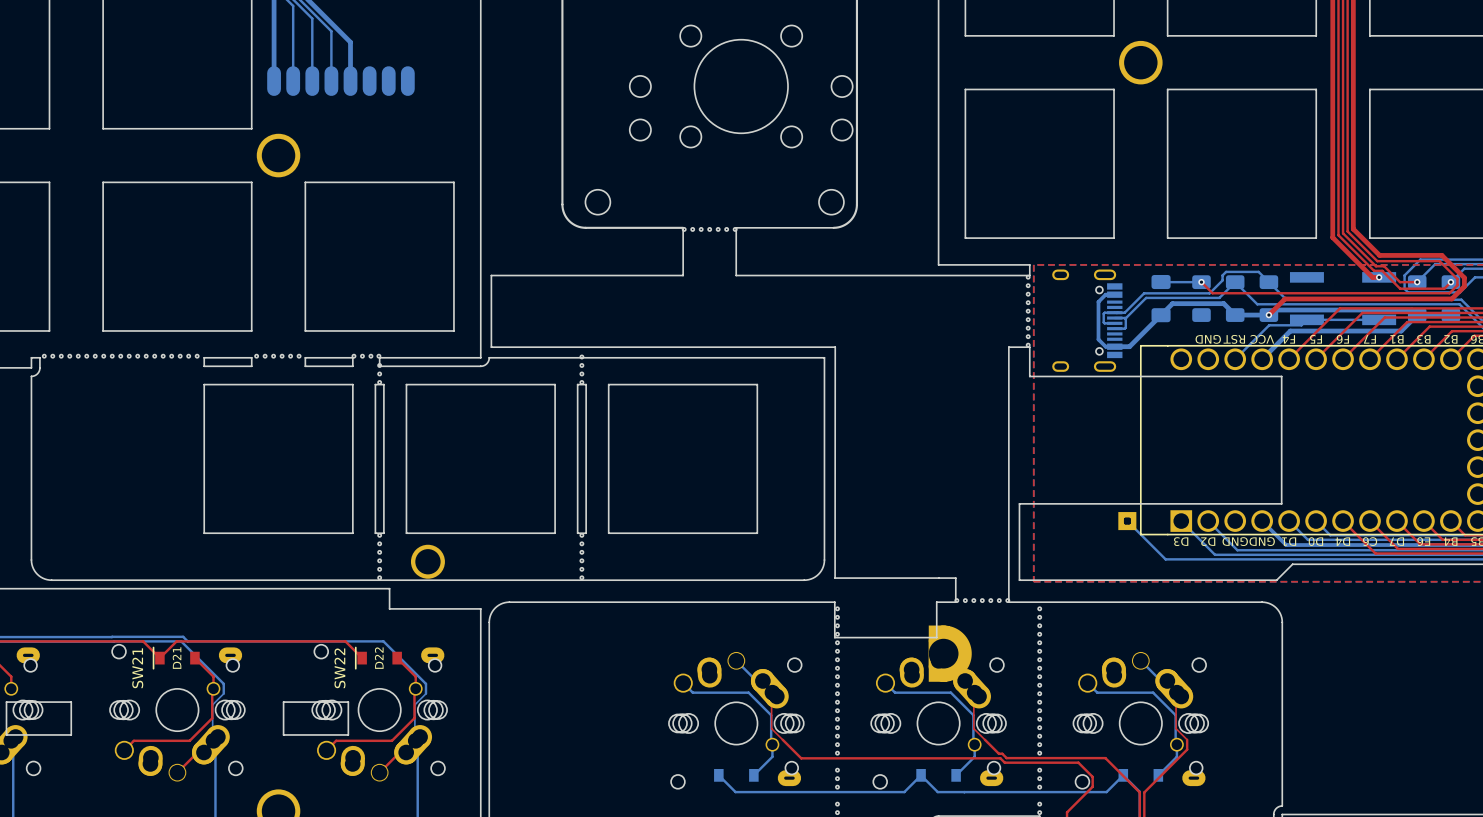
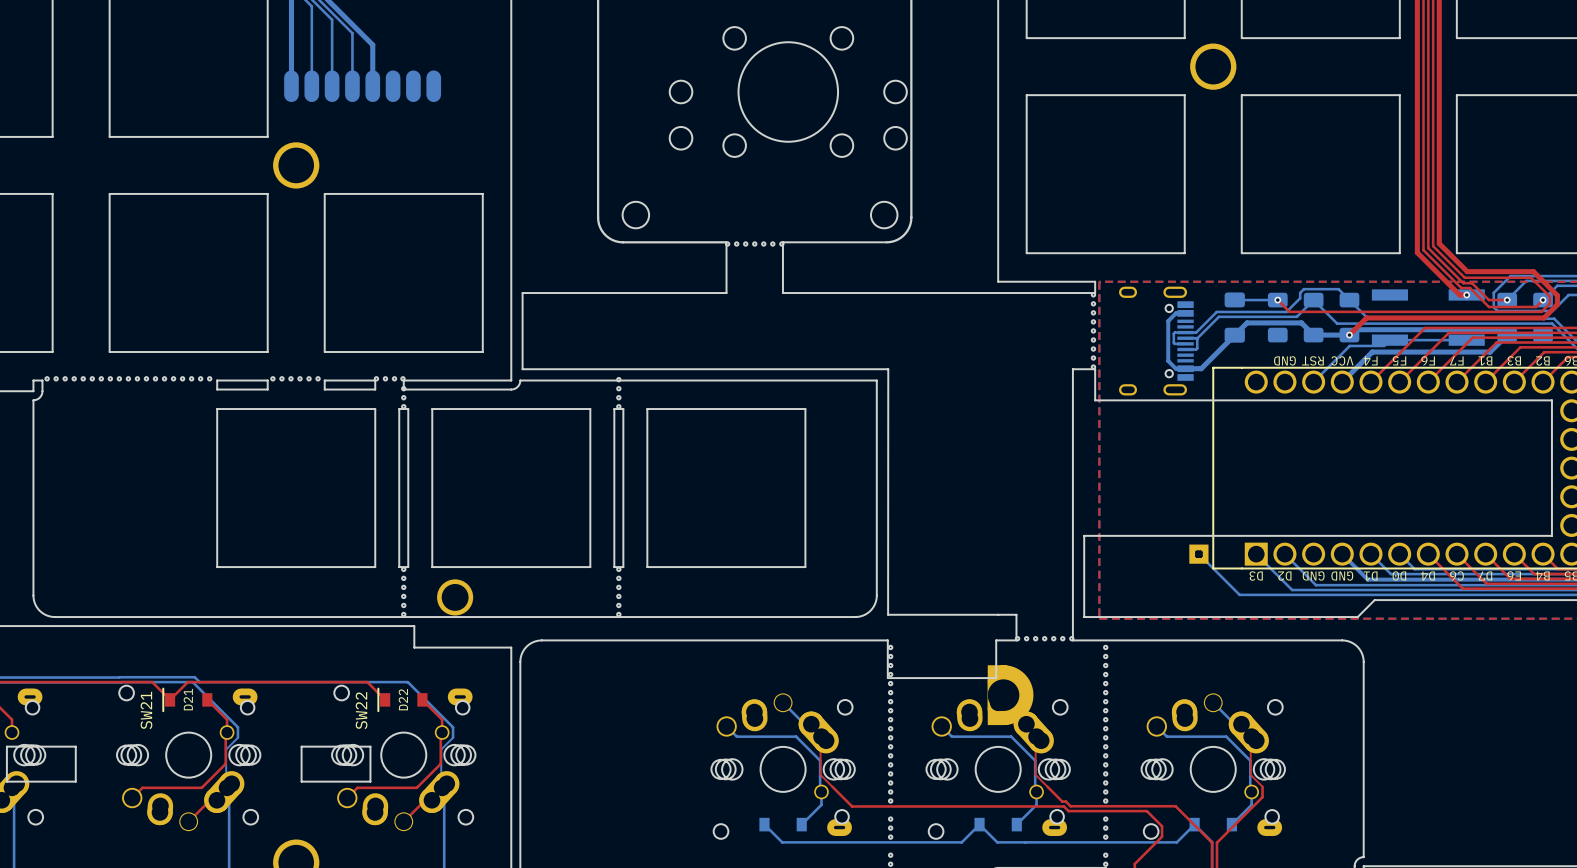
board edge: (1281, 376) (1281, 503) -> (1363, 400) (1551, 400) (1551, 535) (1363, 535)

